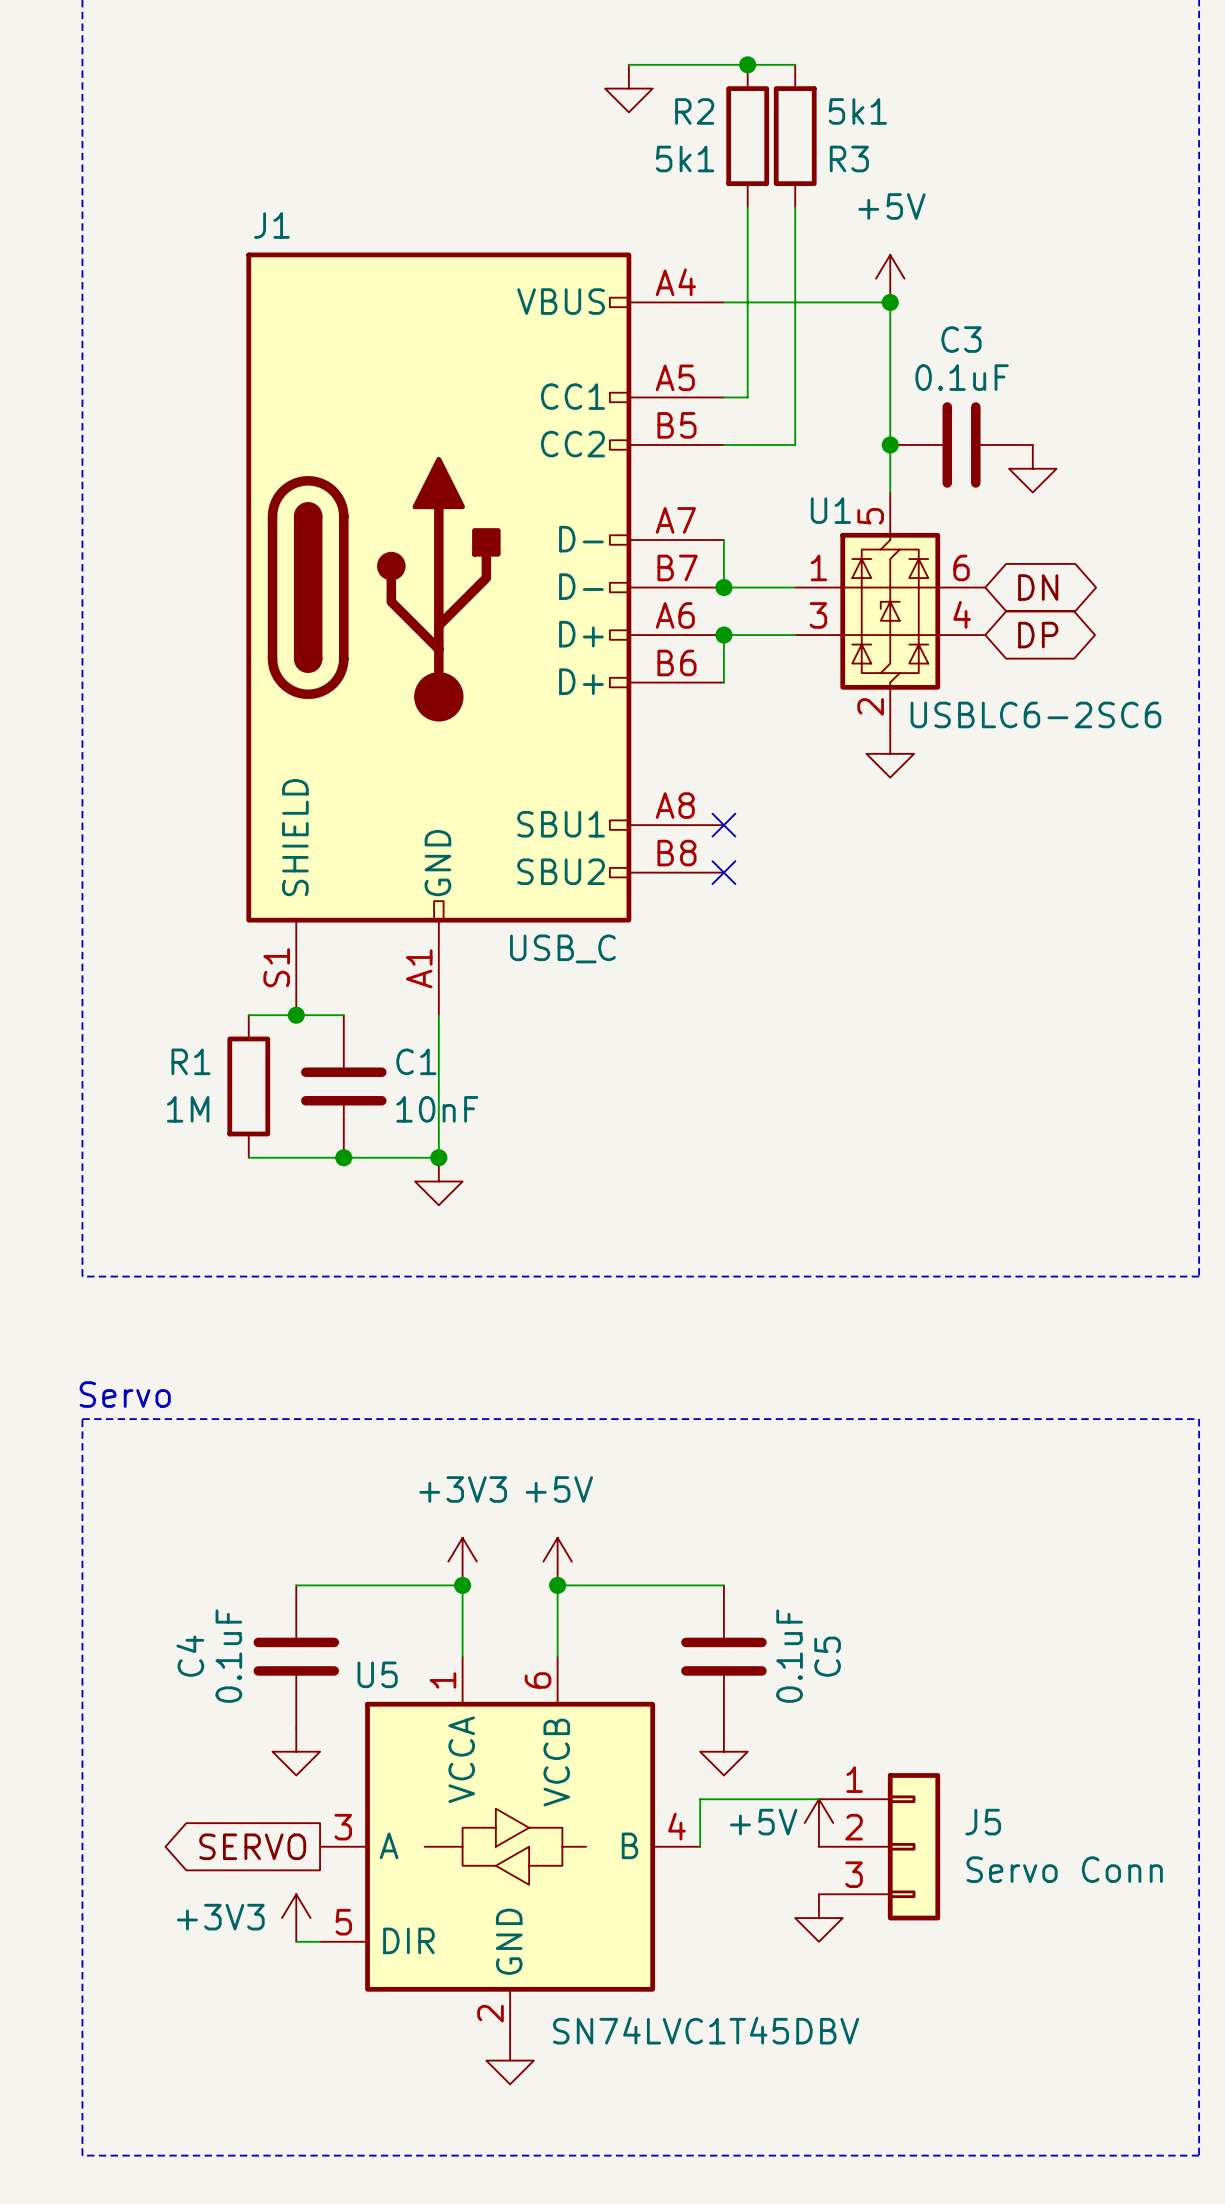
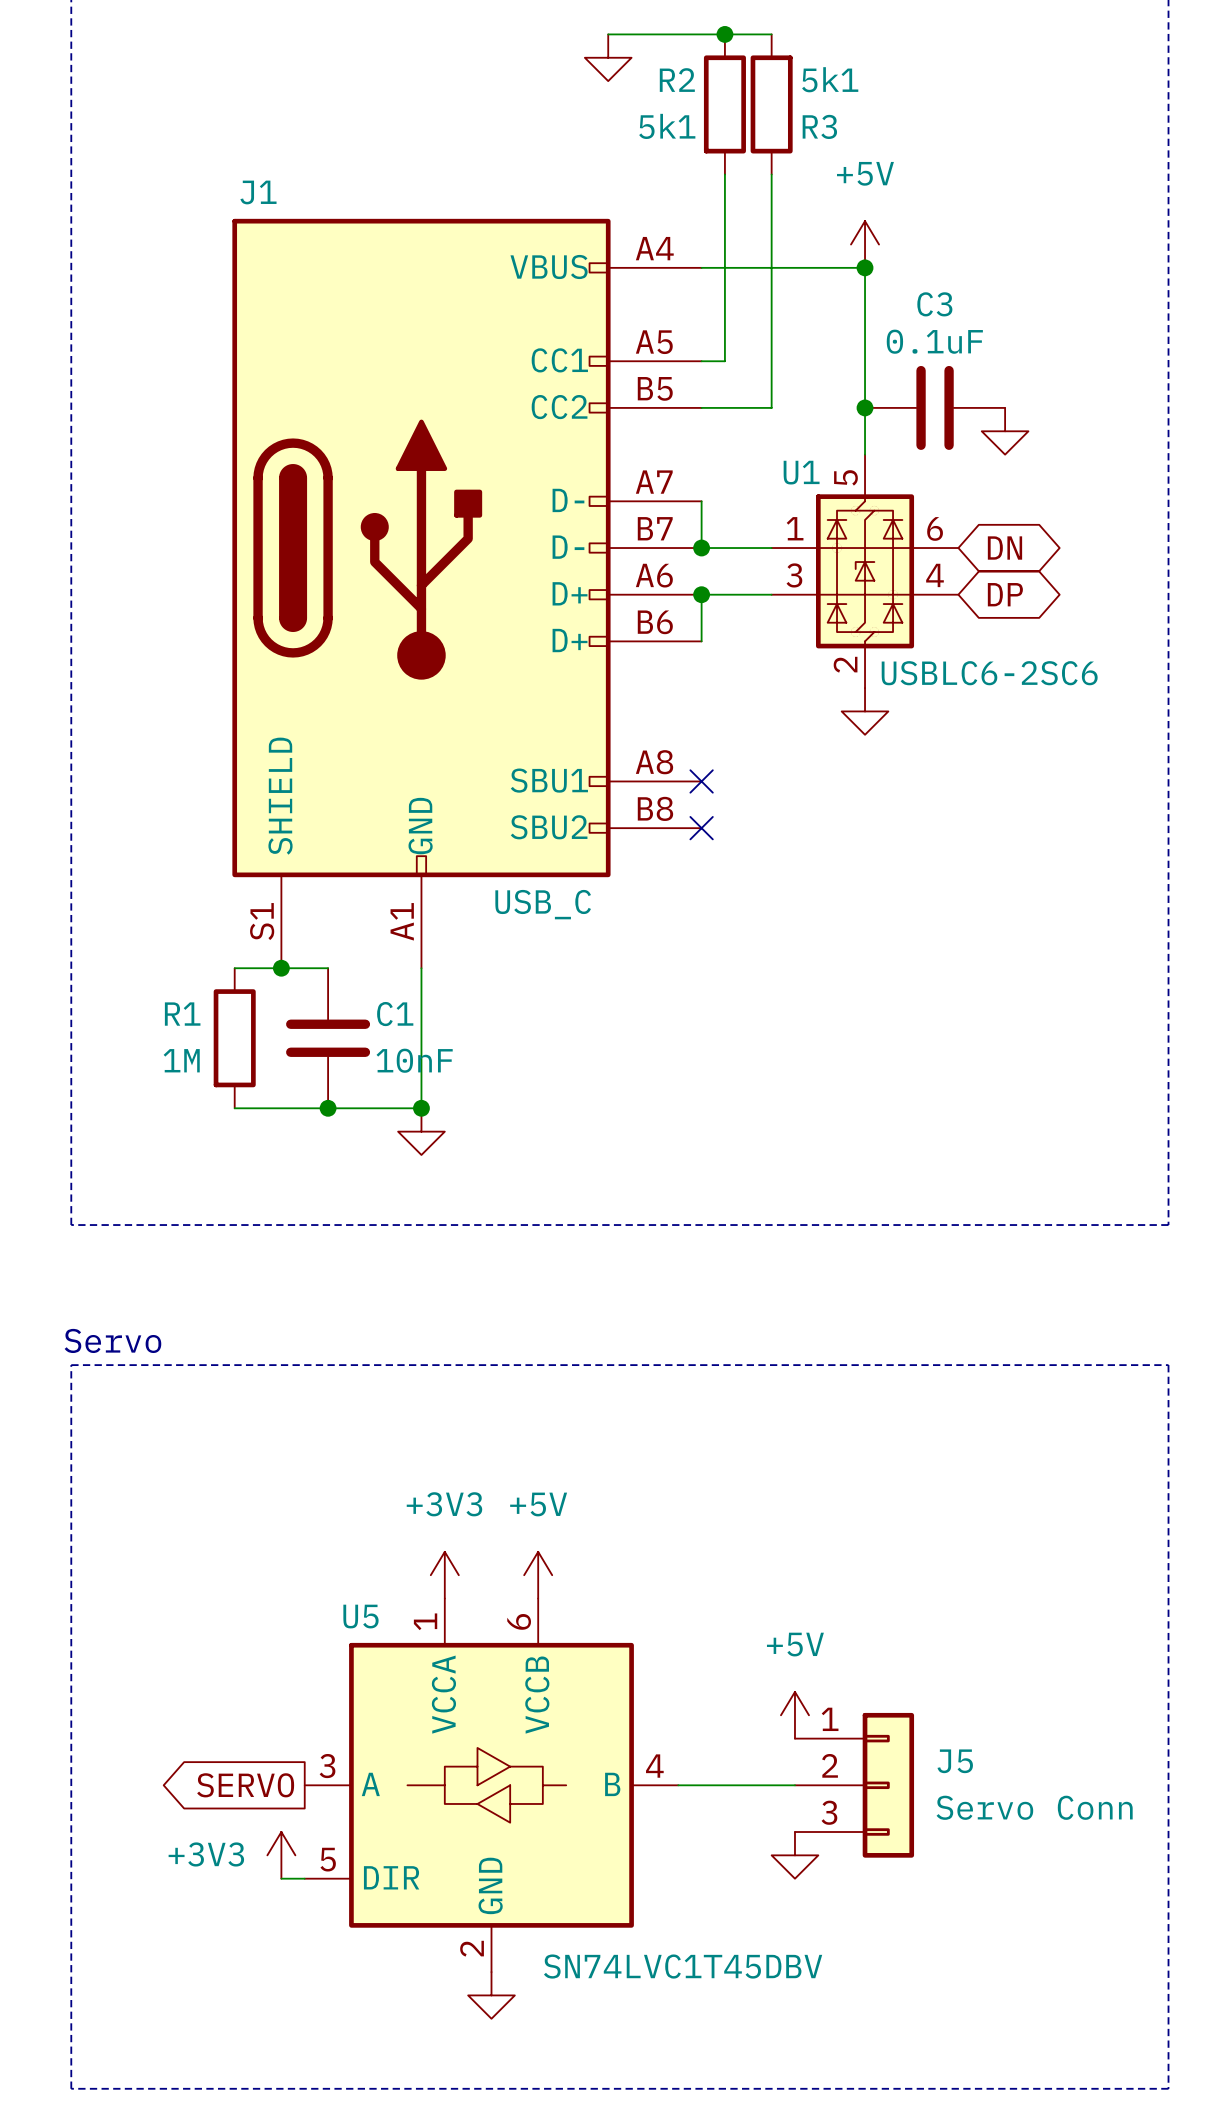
power symbol position: +3V3 (462, 1561) -> +3V3 (444, 1575)
power symbol position: +5V (557, 1561) -> +5V (538, 1575)
wire: (296, 1585) (462, 1585) (462, 1656) -> none
junction: (462, 1585) -> none
junction: (557, 1585) -> none
wire: (723, 1585) (557, 1585) (557, 1656) -> none
C4: 0.1uF (296, 1656) -> none
C5: 0.1uF (723, 1656) -> none
power symbol: (296, 1751) -> none
power symbol: (723, 1751) -> none
wire: (818, 1799) (700, 1799) (700, 1846) -> (794, 1785) (678, 1785)
power symbol text position: +5V (763, 1822) -> +5V (795, 1644)
power symbol position: +5V (818, 1823) -> +5V (794, 1715)

